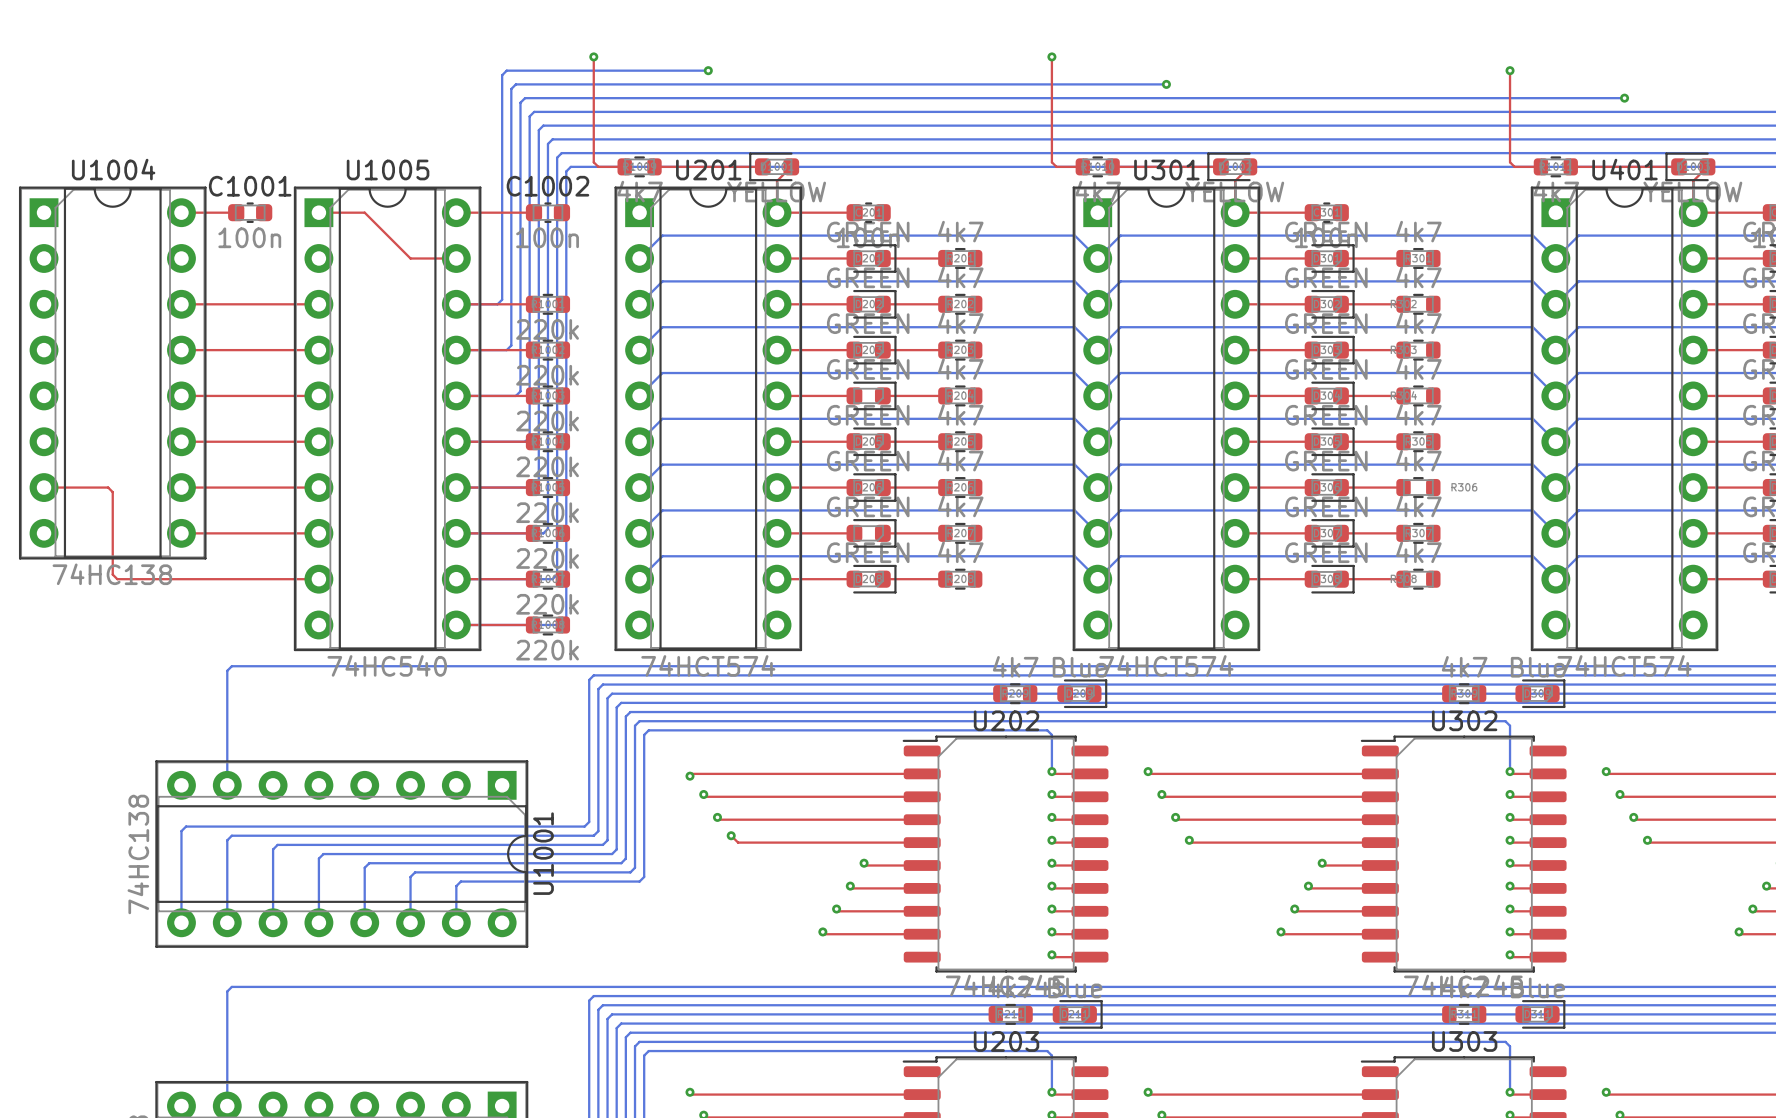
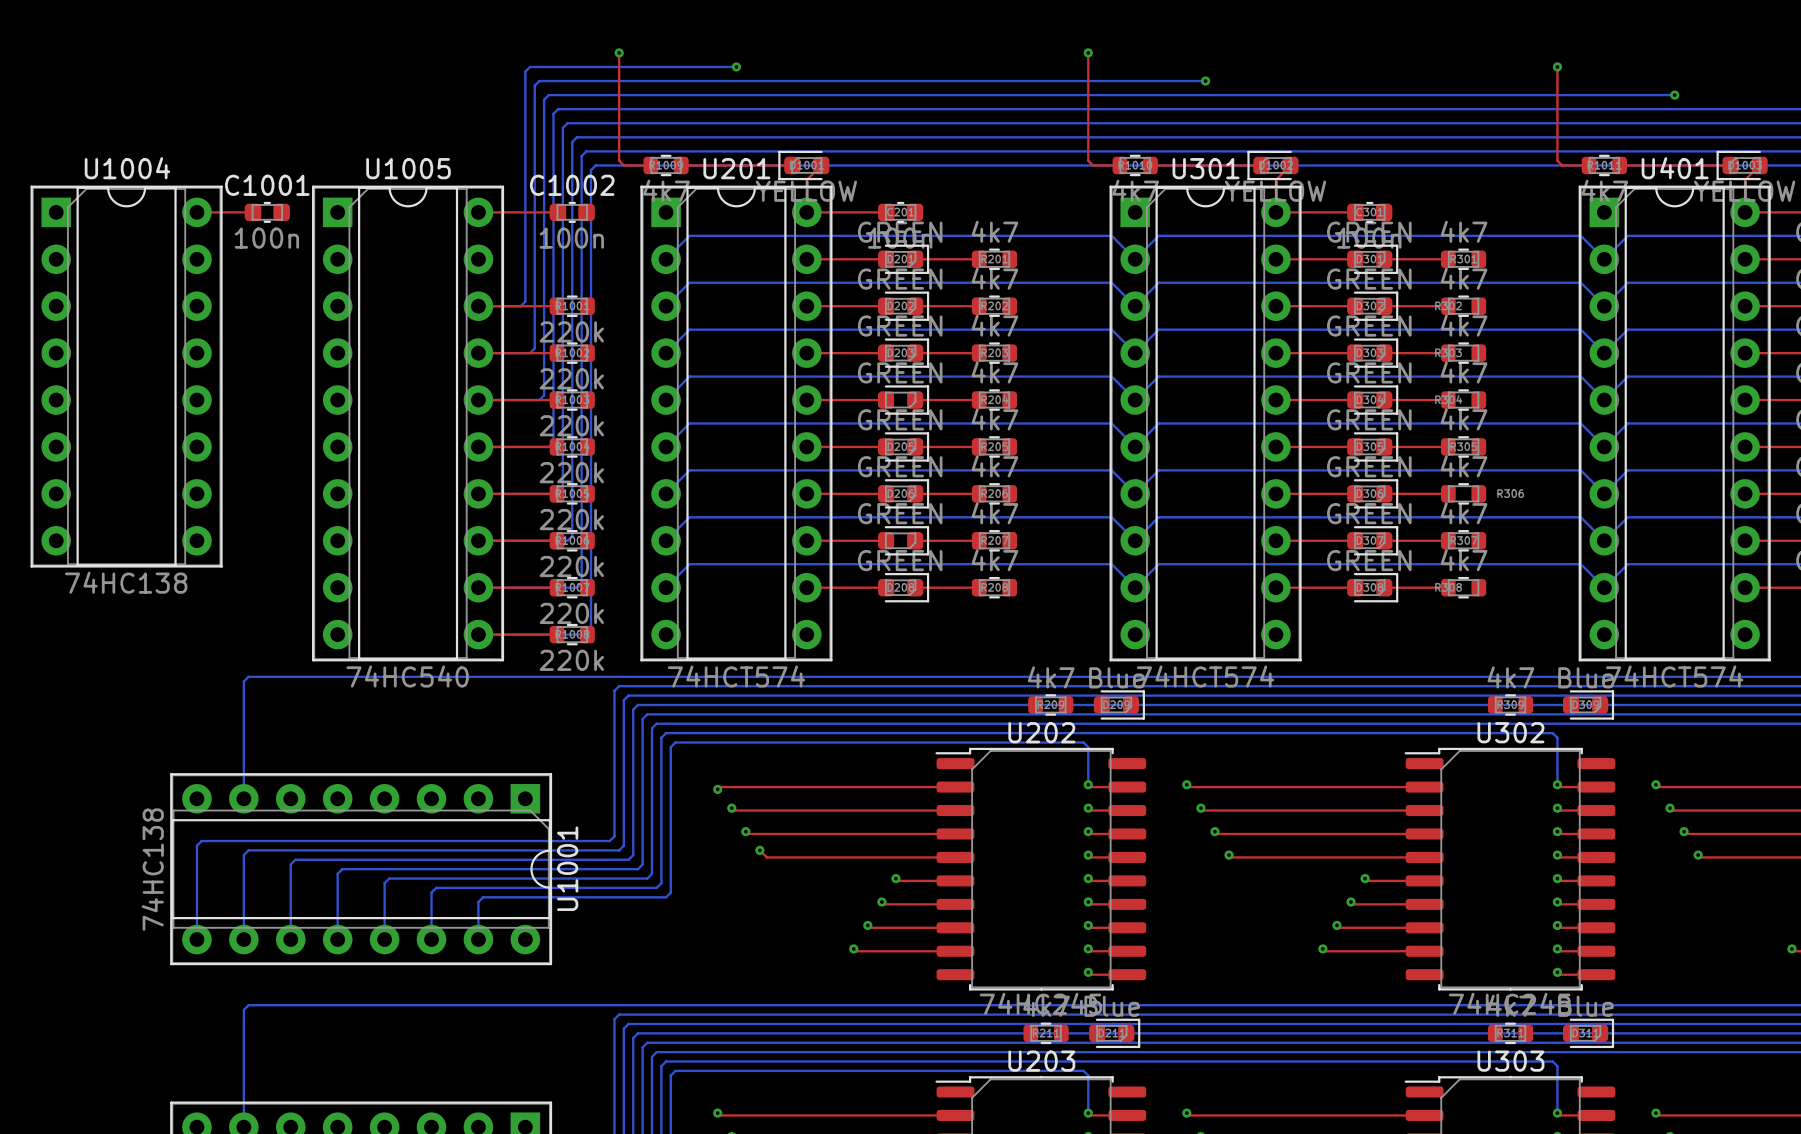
top track: (318, 212) (364, 212) (410, 258) (456, 258) -> none
top track: (181, 304) (318, 304) -> none
top track: (181, 350) (318, 350) -> none
top track: (181, 395) (318, 395) -> none
top track: (181, 441) (318, 441) -> none
top track: (44, 487) (108, 487) (112, 492) (112, 574) (117, 579) (318, 579) -> none
top track: (181, 487) (318, 487) -> none
top track: (181, 533) (318, 533) -> none

